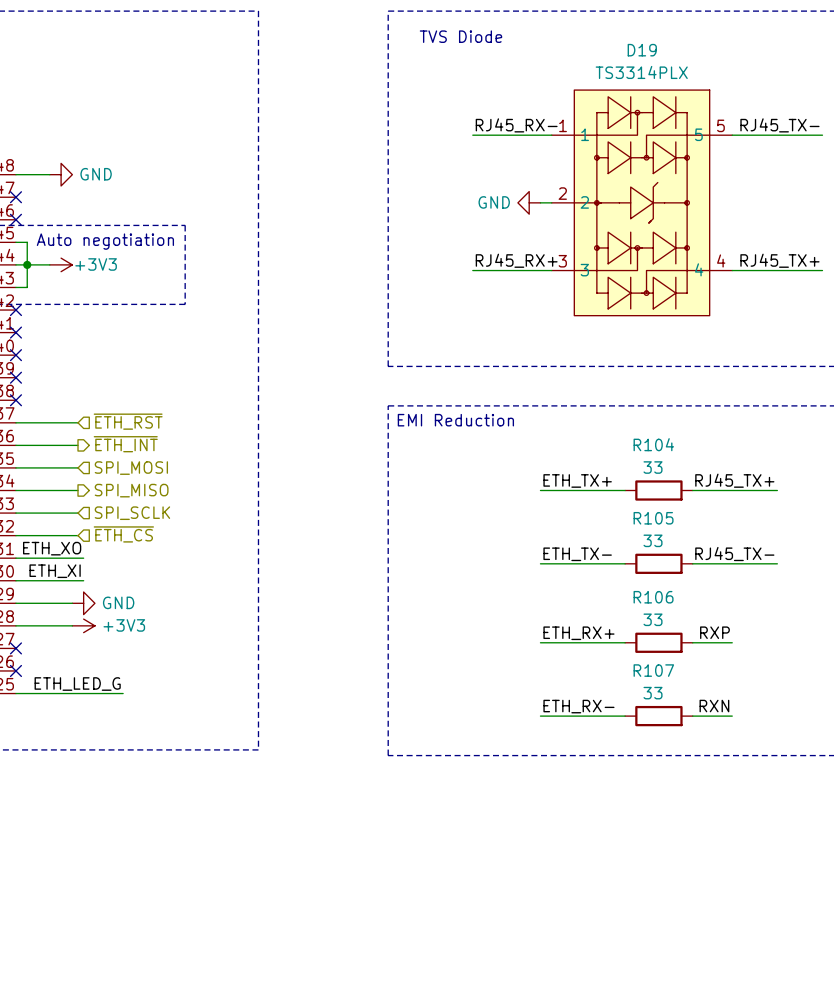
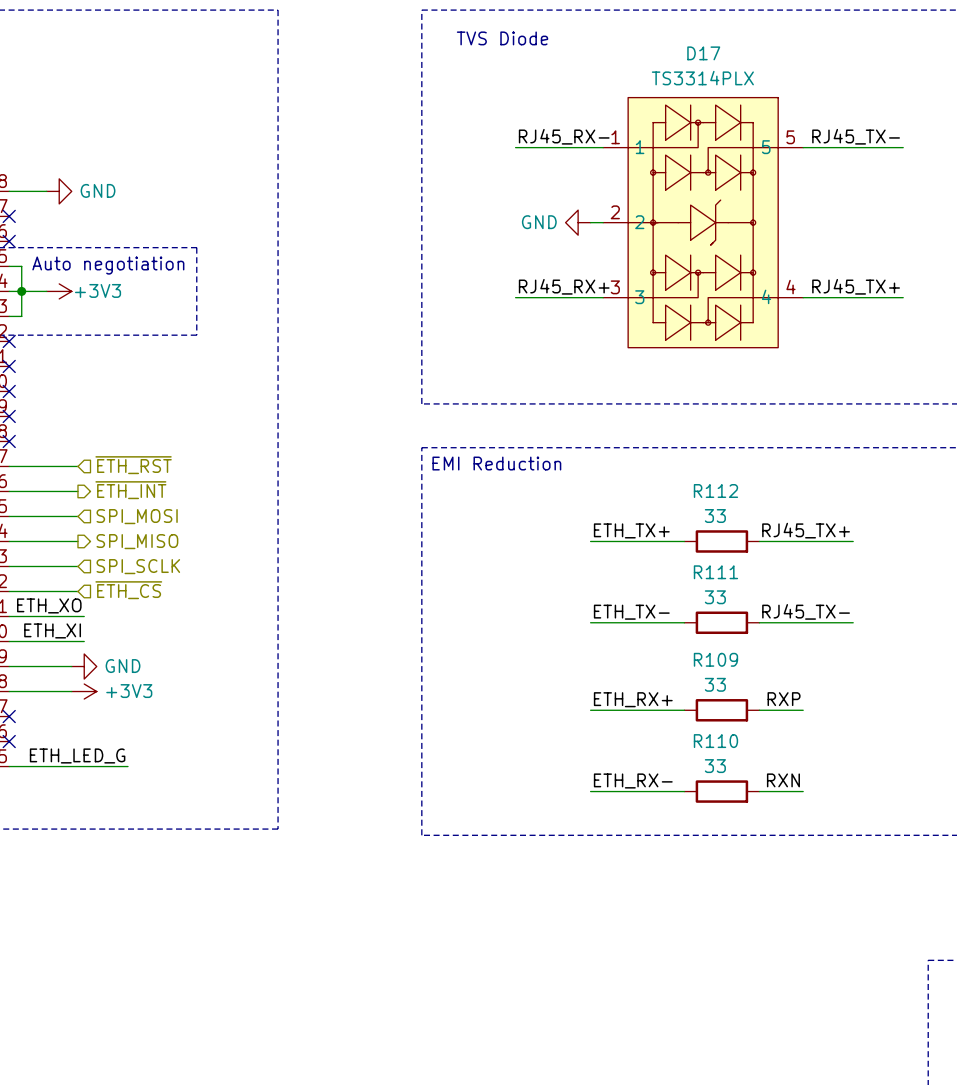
D19 name: D19 (642, 50) -> D17 (703, 53)
R104 name: R104 (653, 444) -> R112 (715, 491)
R105 name: R105 (653, 518) -> R111 (715, 572)
R106 name: R106 (653, 597) -> R109 (715, 659)
R107 name: R107 (653, 670) -> R110 (715, 741)

